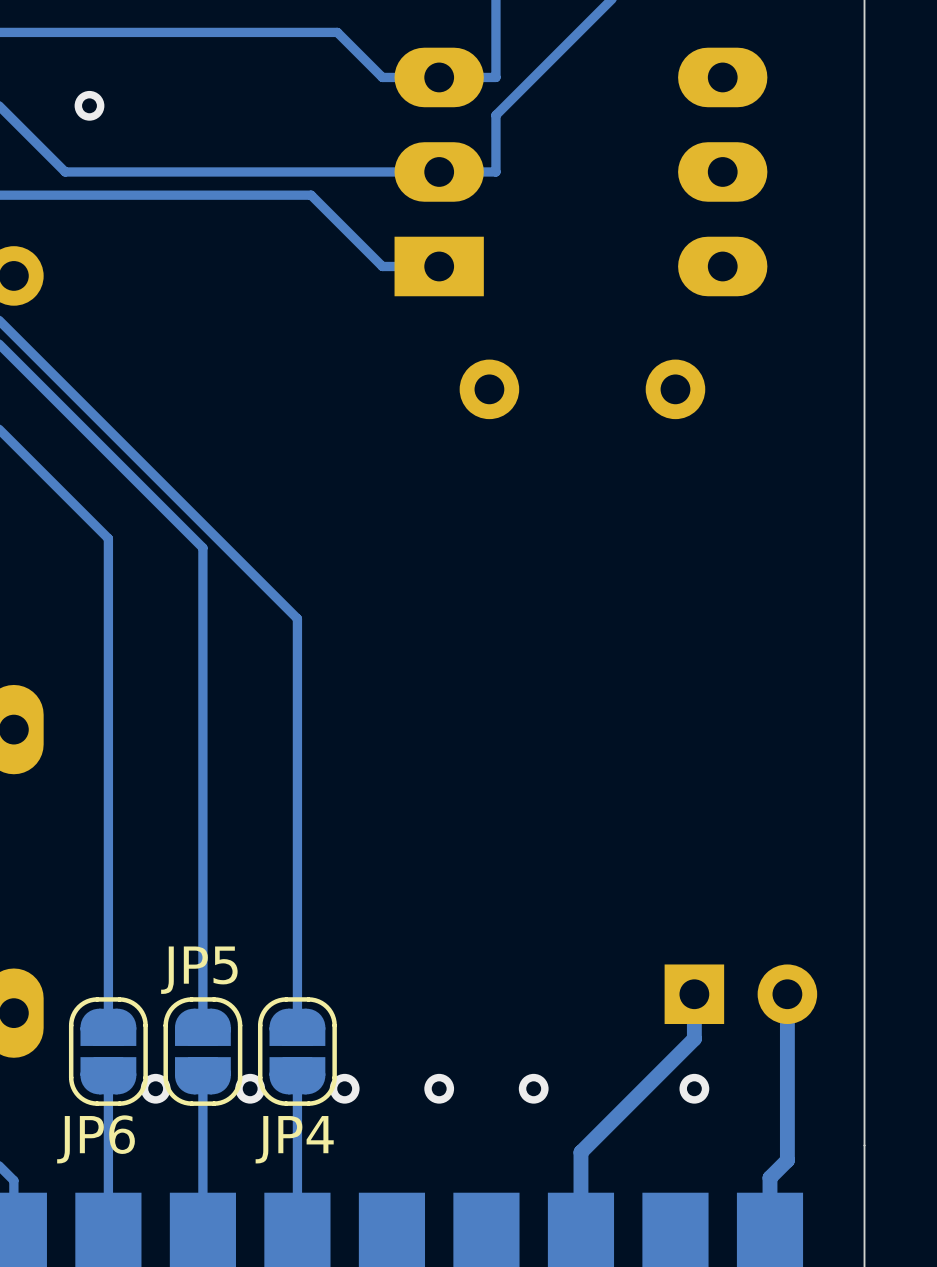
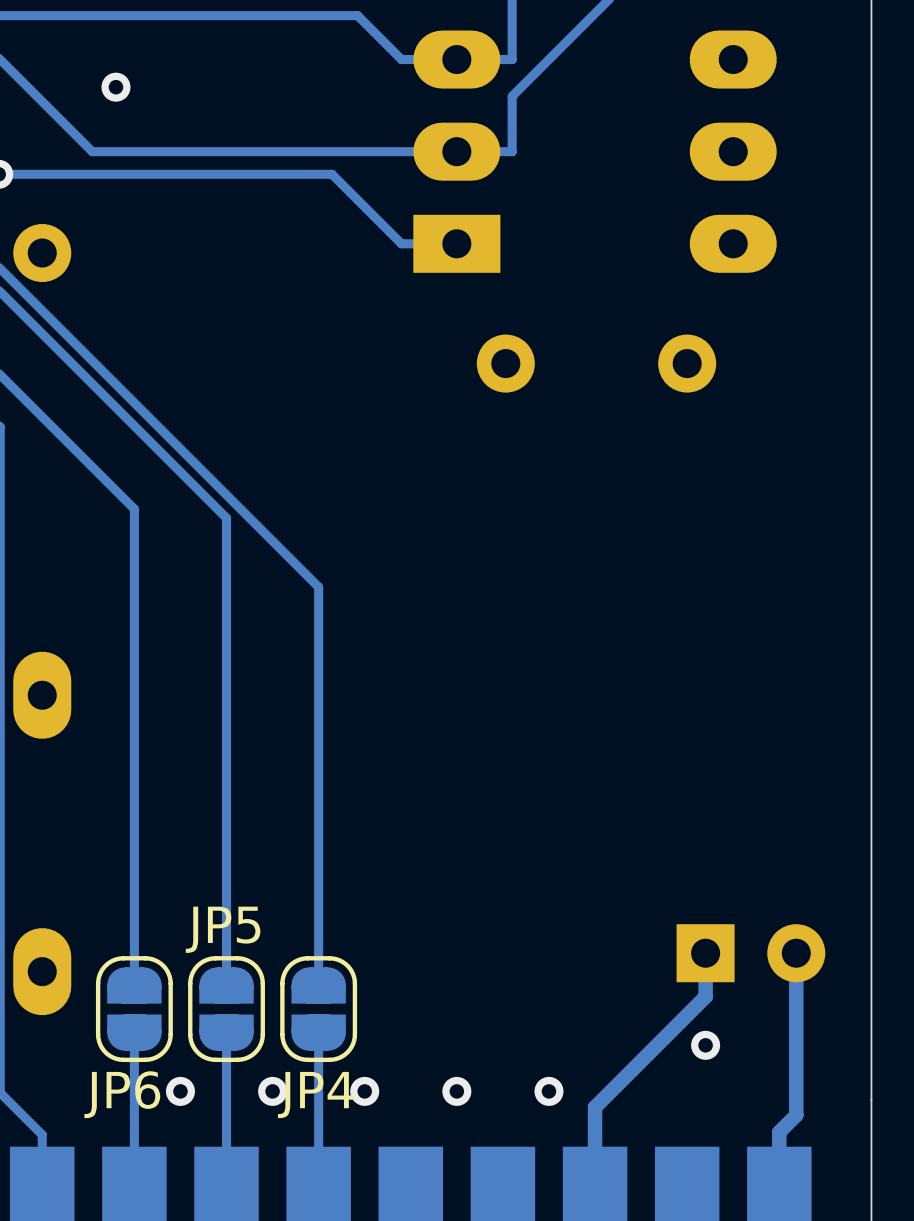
via position: (155, 1088) -> (180, 1091)
via position: (250, 1088) -> (272, 1091)
via position: (344, 1088) -> (364, 1091)
via position: (439, 1088) -> (456, 1091)
via position: (533, 1088) -> (548, 1091)

